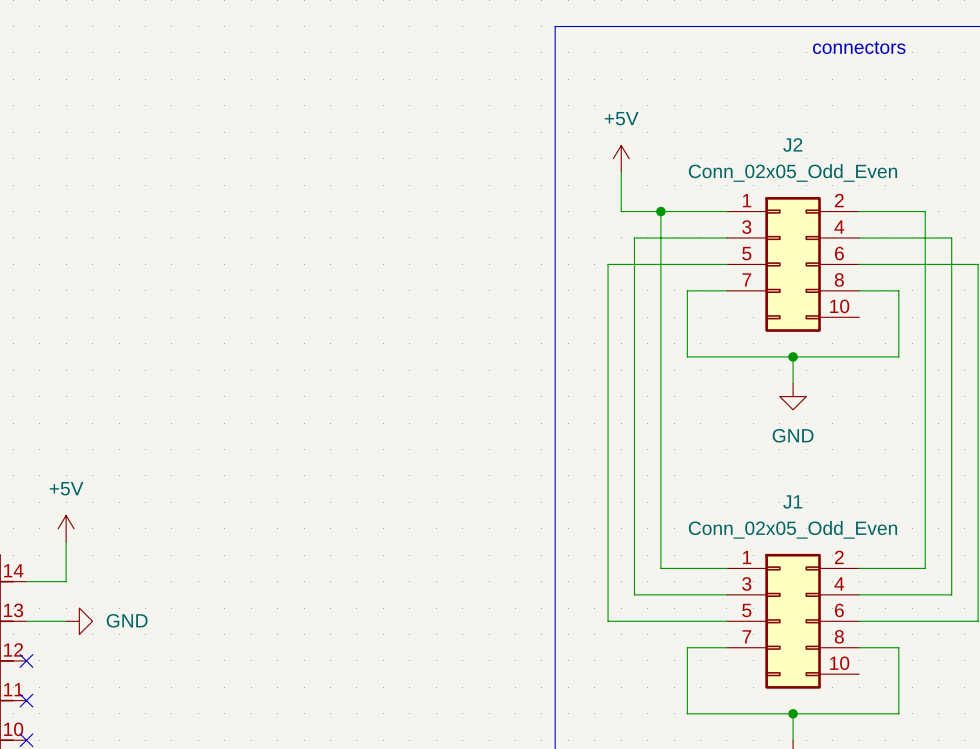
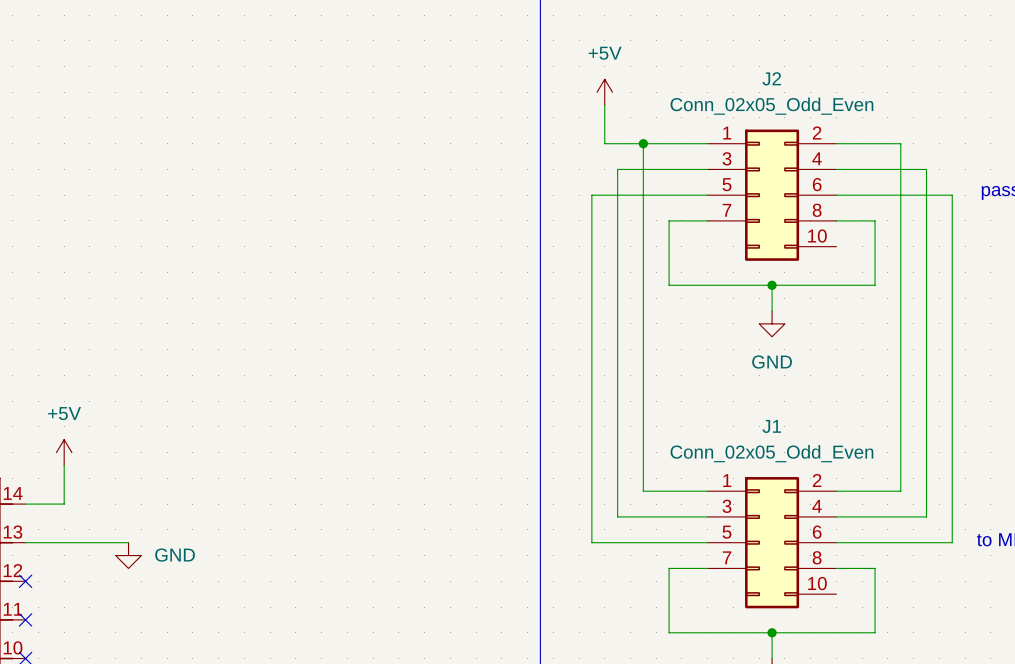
wire: none -> (64, 542) (128, 542)
power symbol rotation: 0° (79, 621) -> 90° clockwise (128, 555)
power symbol position: GND (79, 621) -> GND (128, 555)

